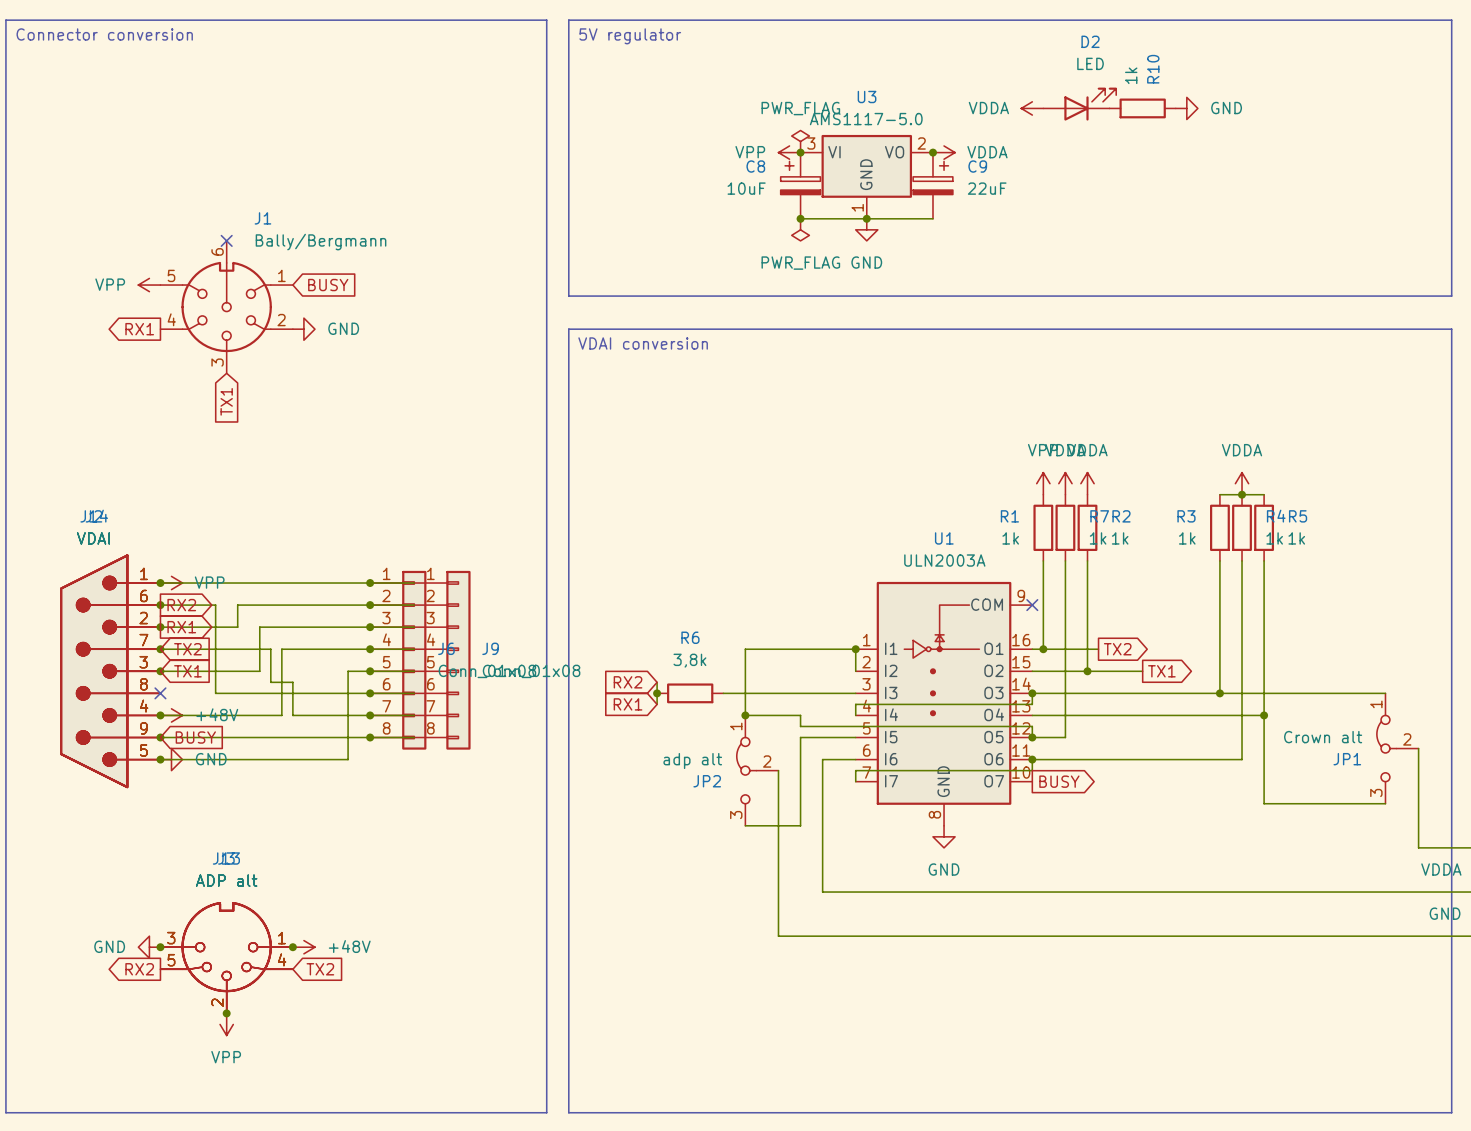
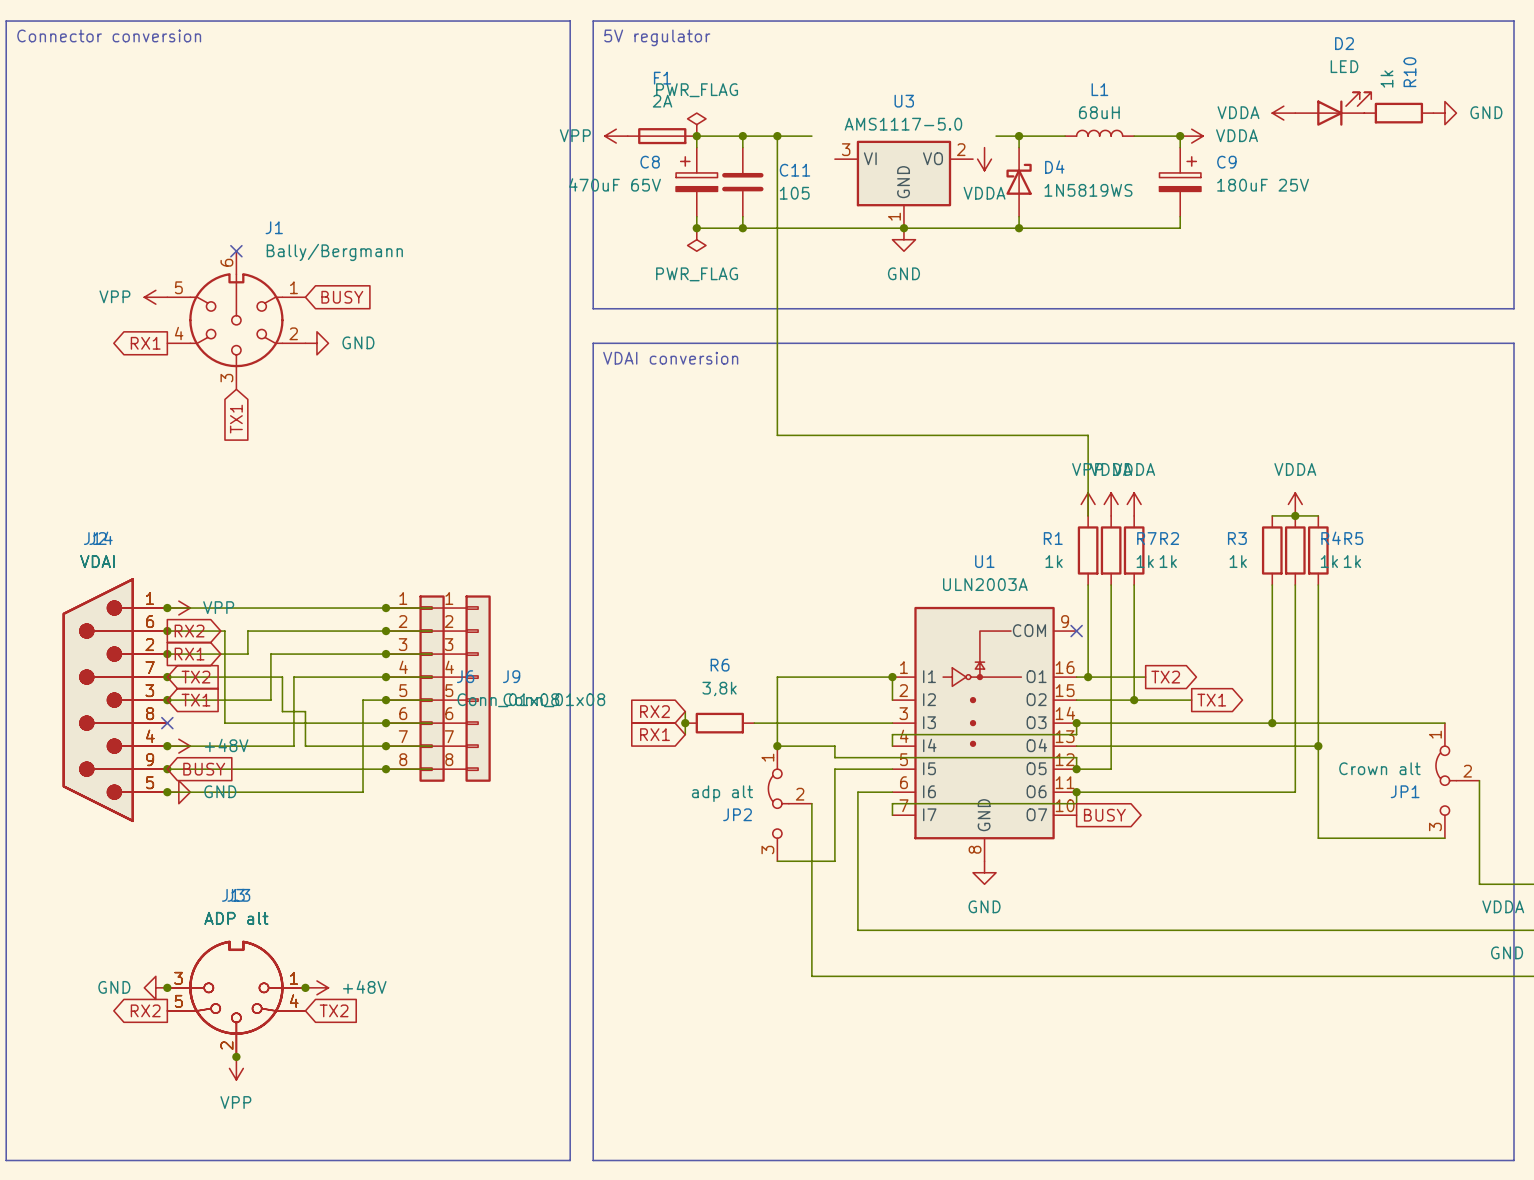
D2 position: (1079, 104) -> (1333, 109)
power symbol: VDDA (1032, 108) -> none
R10 position: (1142, 108) -> (1398, 113)
power symbol position: GND (1186, 108) -> GND (1444, 113)
power symbol: none -> VDDA (1283, 113)
power symbol: none -> PWR_FLAG (696, 124)
L1: none -> 68uH (1099, 133)
F1: none -> 2A (662, 136)
junction: none -> (696, 136)
wire: none -> (742, 136) (742, 147)
junction: none -> (742, 136)
wire: none -> (777, 136) (777, 435) (1088, 435) (1088, 515)
junction: none -> (777, 136)
wire: none -> (811, 136) (696, 136) (696, 147)
wire: none -> (996, 136) (1065, 136)
wire: none -> (1019, 136) (1019, 147)
junction: none -> (1019, 136)
wire: none -> (1134, 136) (1180, 136) (1180, 147)
junction: none -> (1180, 136)
power symbol: none -> VDDA (1191, 136)
power symbol: PWR_FLAG (800, 141) -> none
power symbol position: VPP (789, 152) -> VPP (616, 136)
junction: (800, 152) -> none
junction: (932, 152) -> none
power symbol rotation: 0° (944, 152) -> 90° clockwise (984, 159)
C11: none -> 105 (742, 182)
D4: none -> 1N5819WS (1019, 182)
C8 position: (800, 185) -> (696, 182)
C9 position: (932, 185) -> (1180, 182)
C8 value: 10uF (746, 188) -> 470uF 65V (615, 184)
C9 value: 22uF (987, 188) -> 180uF 25V (1263, 185)
wire: none -> (696, 216) (696, 228) (834, 228)
wire: none -> (742, 216) (742, 228)
wire: none -> (1019, 216) (1019, 228)
wire: none -> (1180, 216) (1180, 228) (973, 228)
junction: none -> (696, 228)
junction: none -> (742, 228)
junction: (800, 218) -> none
junction: none -> (1019, 228)
power symbol: none -> PWR_FLAG (696, 239)
power symbol: PWR_FLAG (800, 229) -> none

